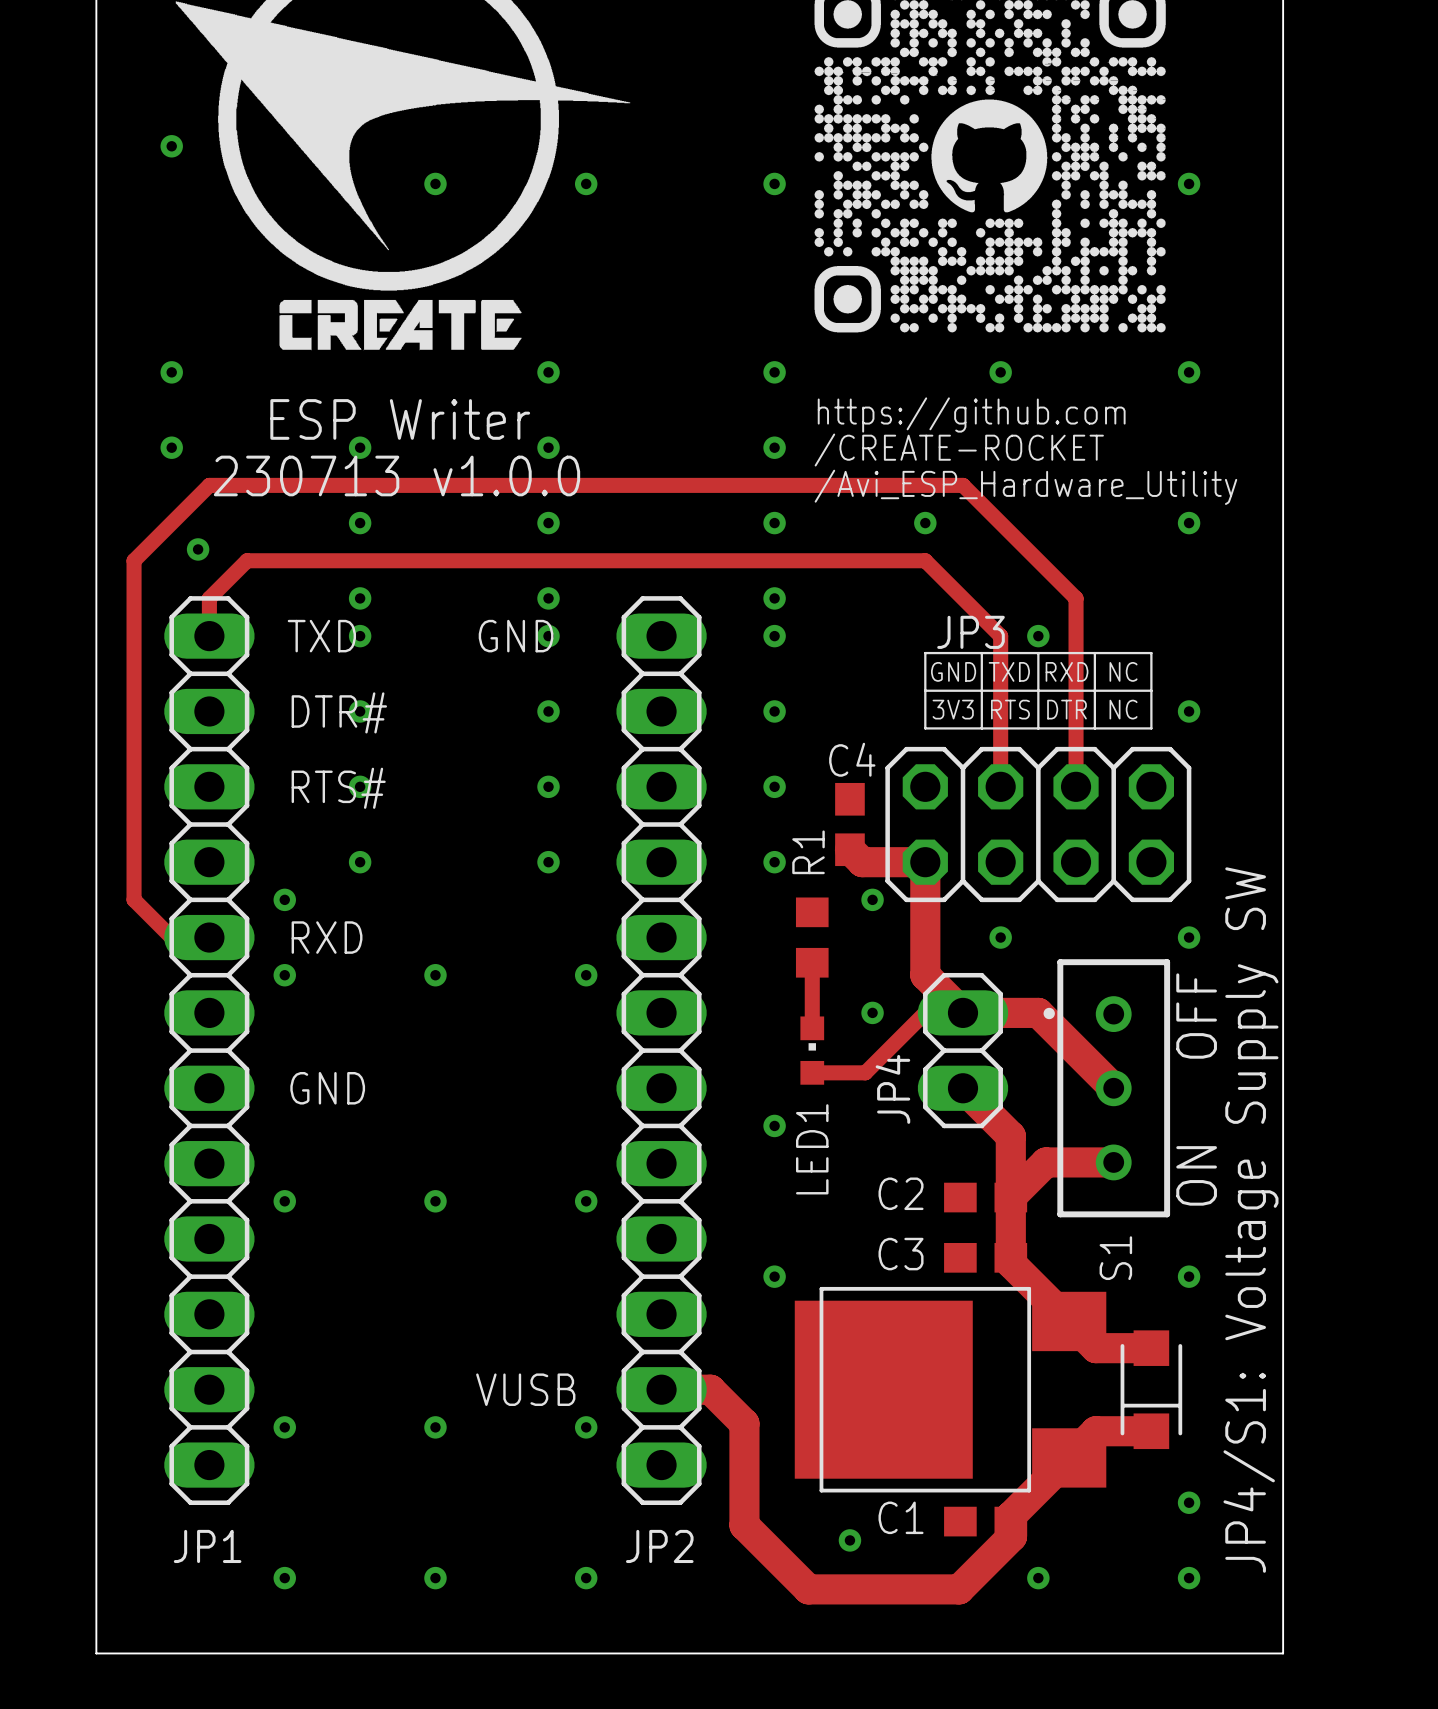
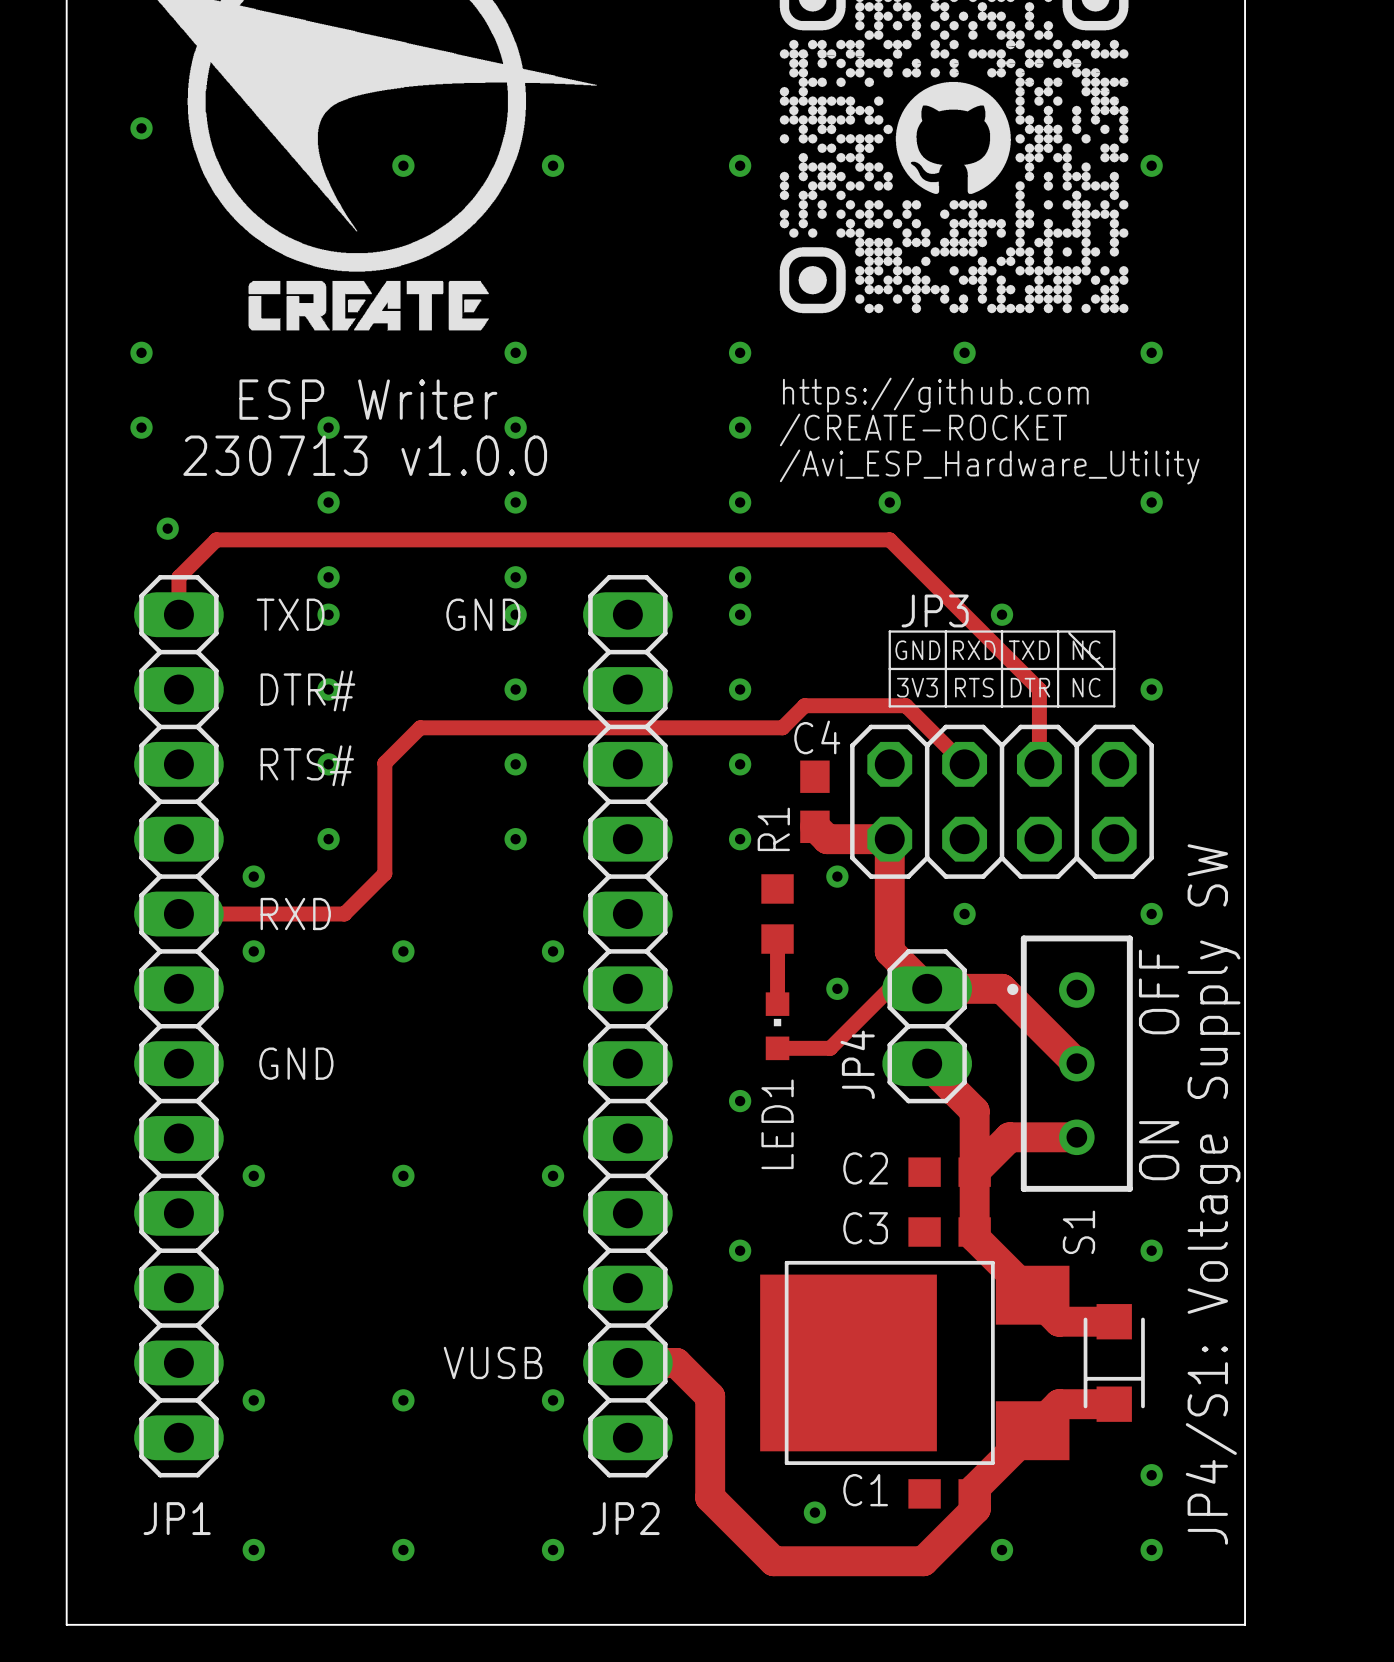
track: (1000, 636) (1000, 786) -> (964, 614) (1039, 689)
line: none -> (1069, 633) (1103, 667)
text: TXD (1009, 671) -> RXD (974, 650)
text: RXD (1067, 671) -> TXD (1029, 650)
track: (1076, 711) (1076, 598) (962, 485) (209, 485) (134, 560) (134, 899) (171, 937) (209, 937) -> (964, 764) (905, 705) (804, 705) (782, 727) (420, 727) (384, 763) (384, 873) (344, 914) (178, 914)

